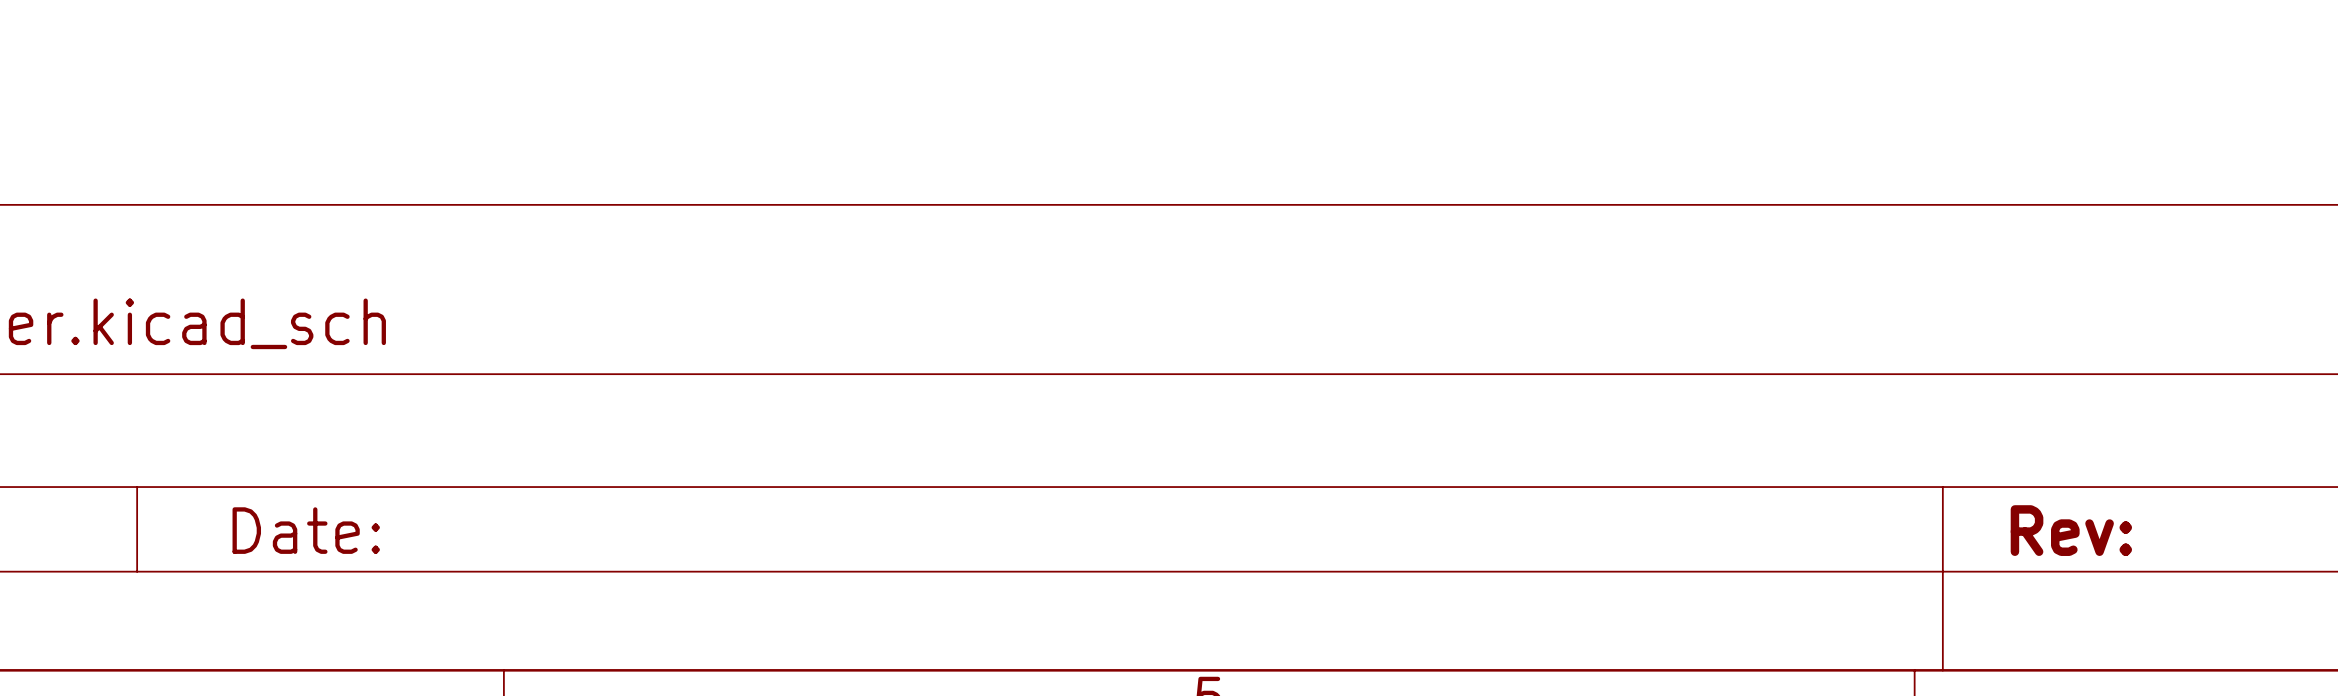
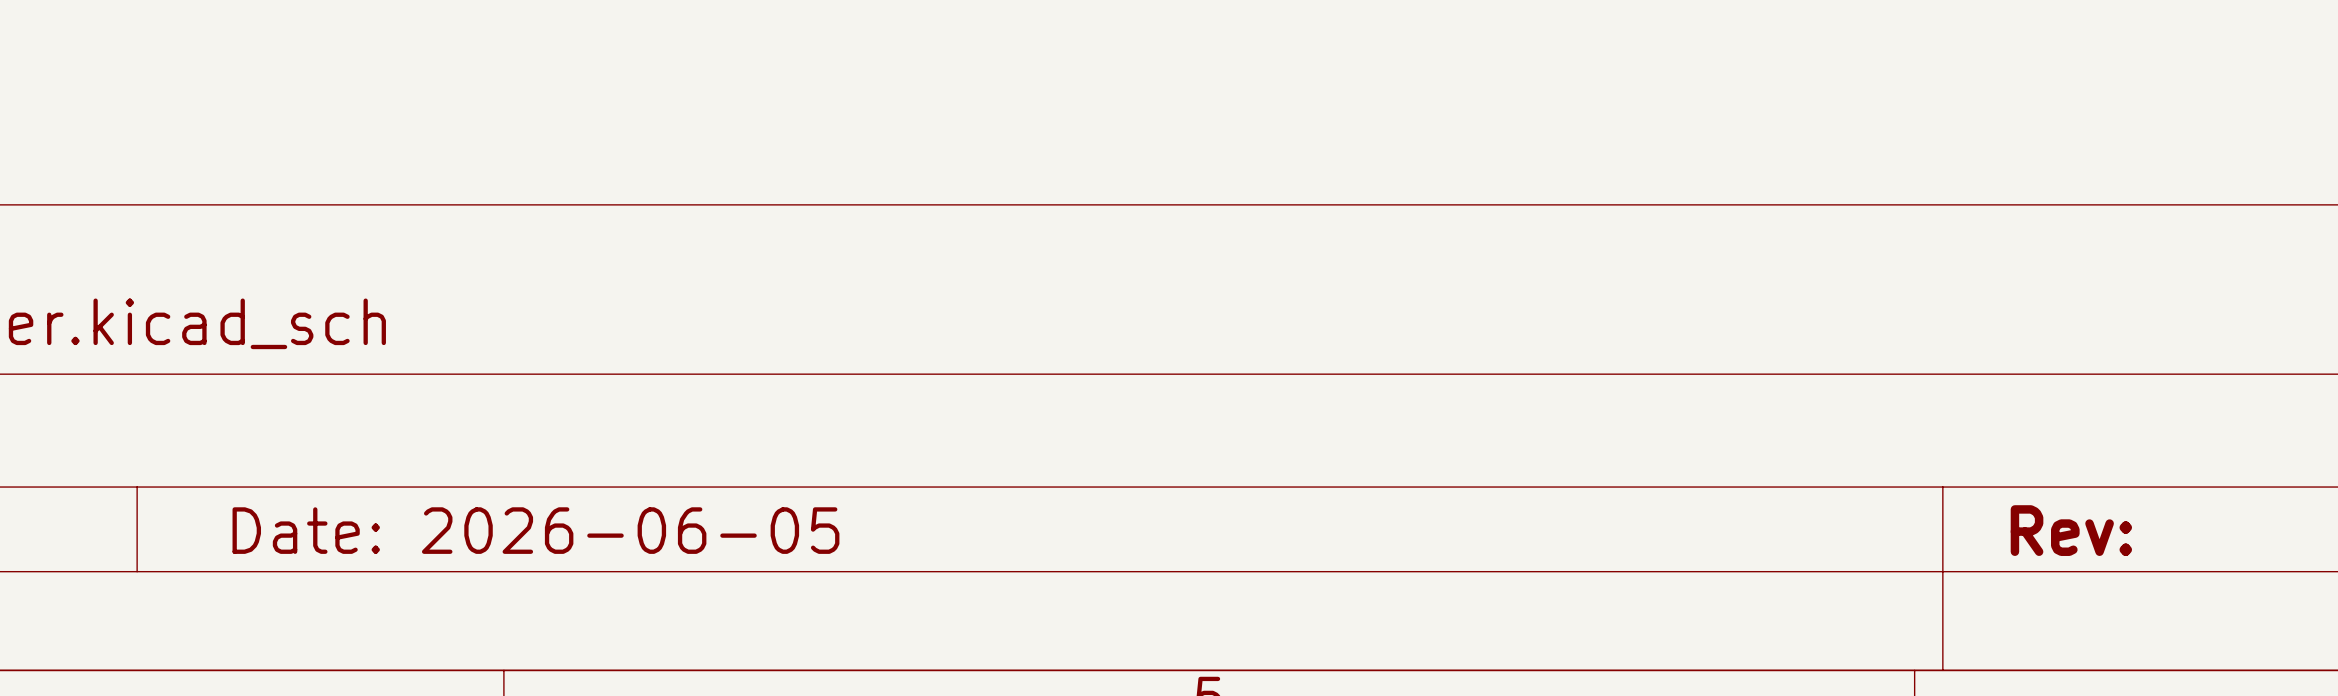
title block: Date: (306, 530) -> Date: 2026-06-05 (535, 530)

